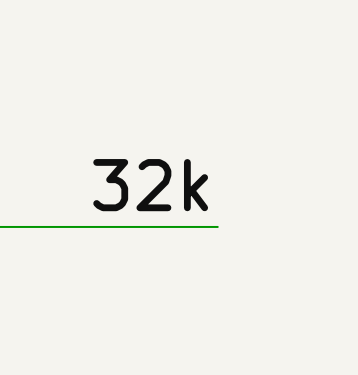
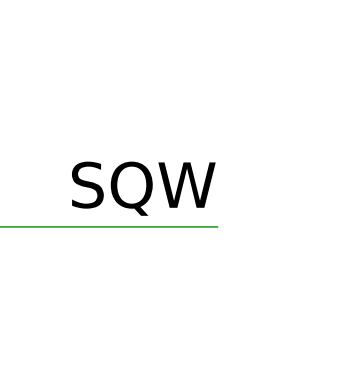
label: 32k (150, 185) -> SQW (143, 188)

